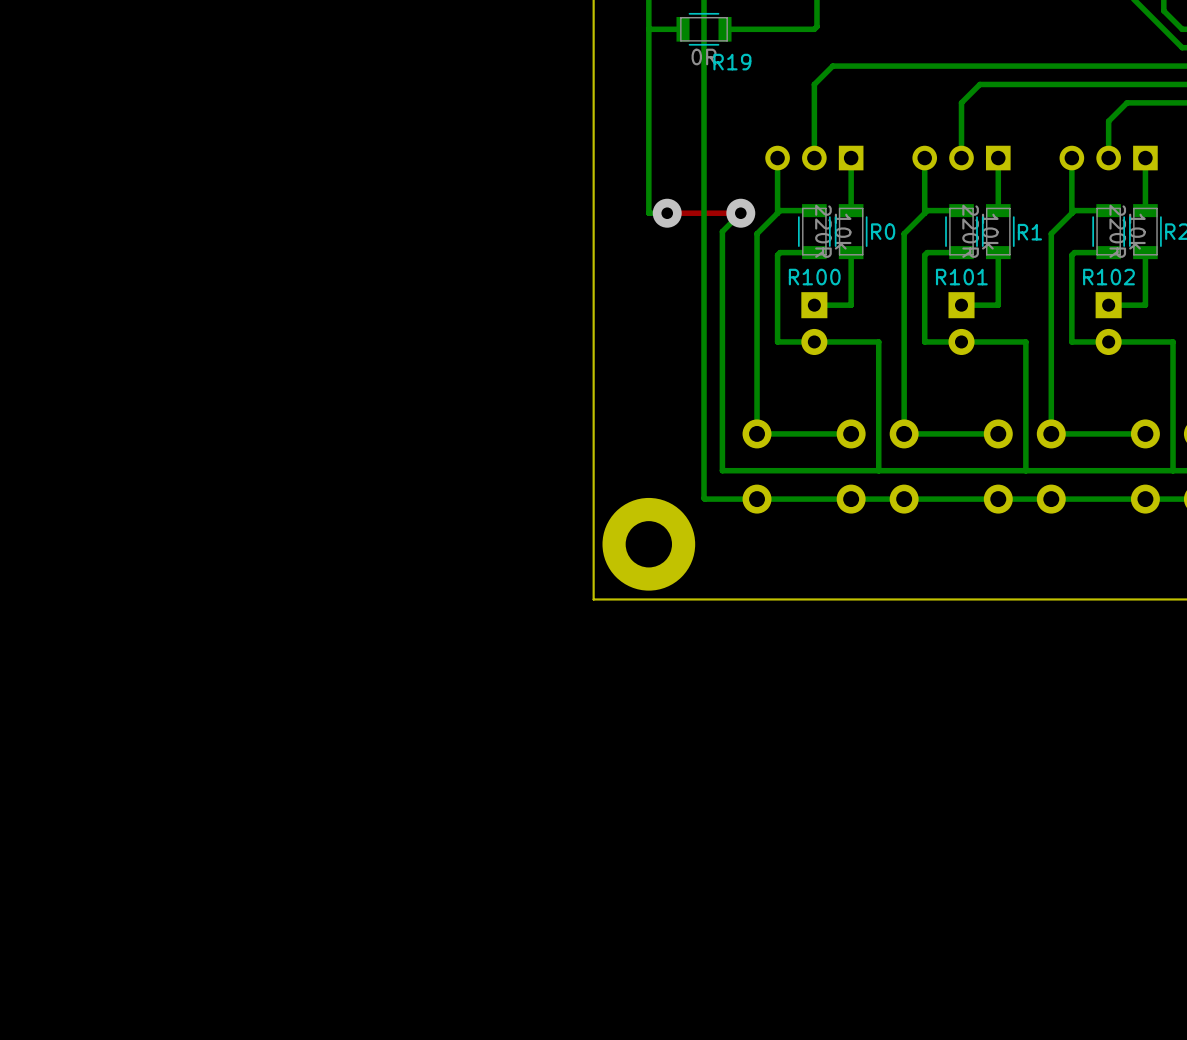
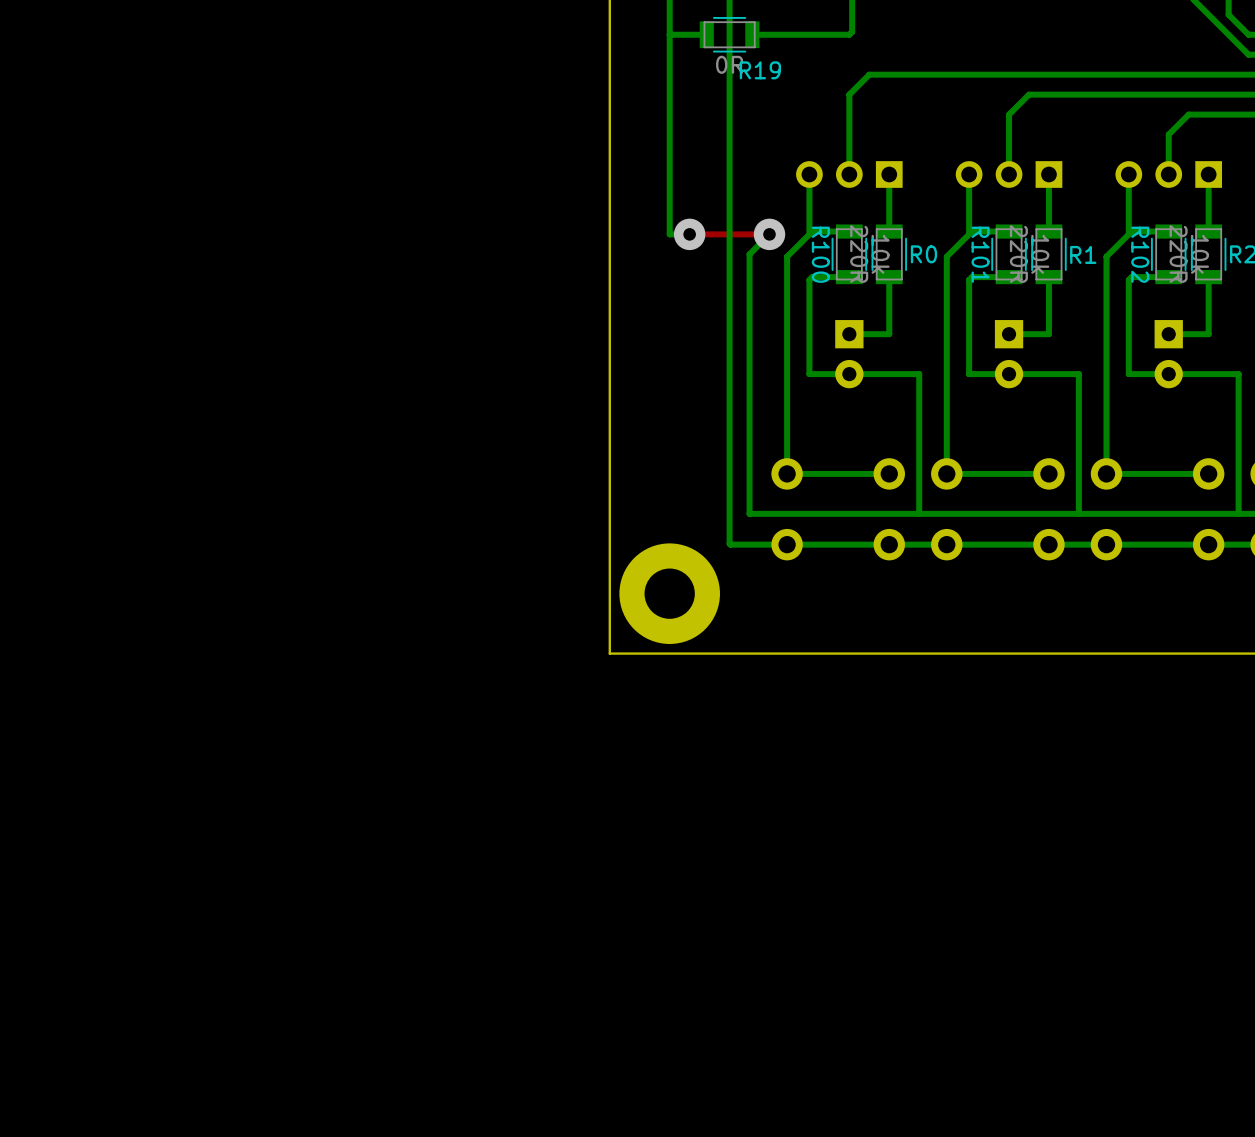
R100 name rotation: 0° (814, 277) -> 90° clockwise (820, 254)
R101 name rotation: 0° (961, 277) -> 90° clockwise (980, 254)
R102 name rotation: 0° (1108, 277) -> 90° clockwise (1140, 254)

